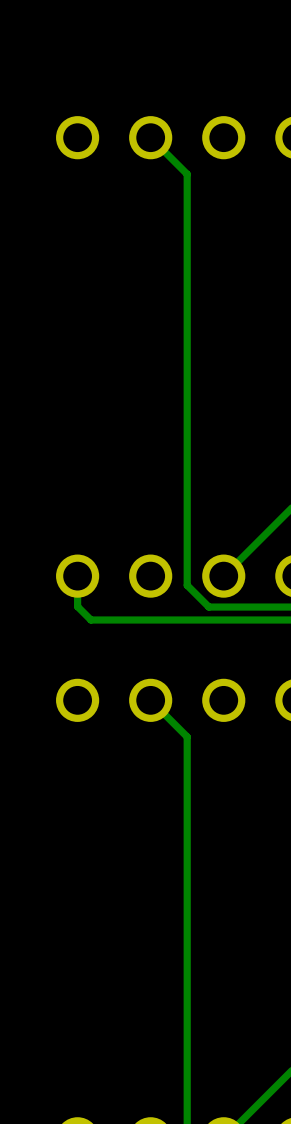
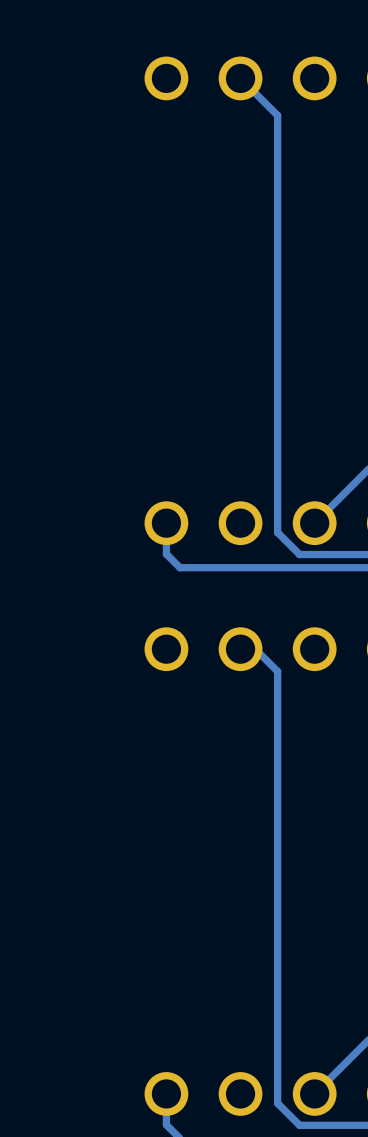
track: (150, 700) (187, 736) -> (240, 634) (277, 671) (277, 686)

